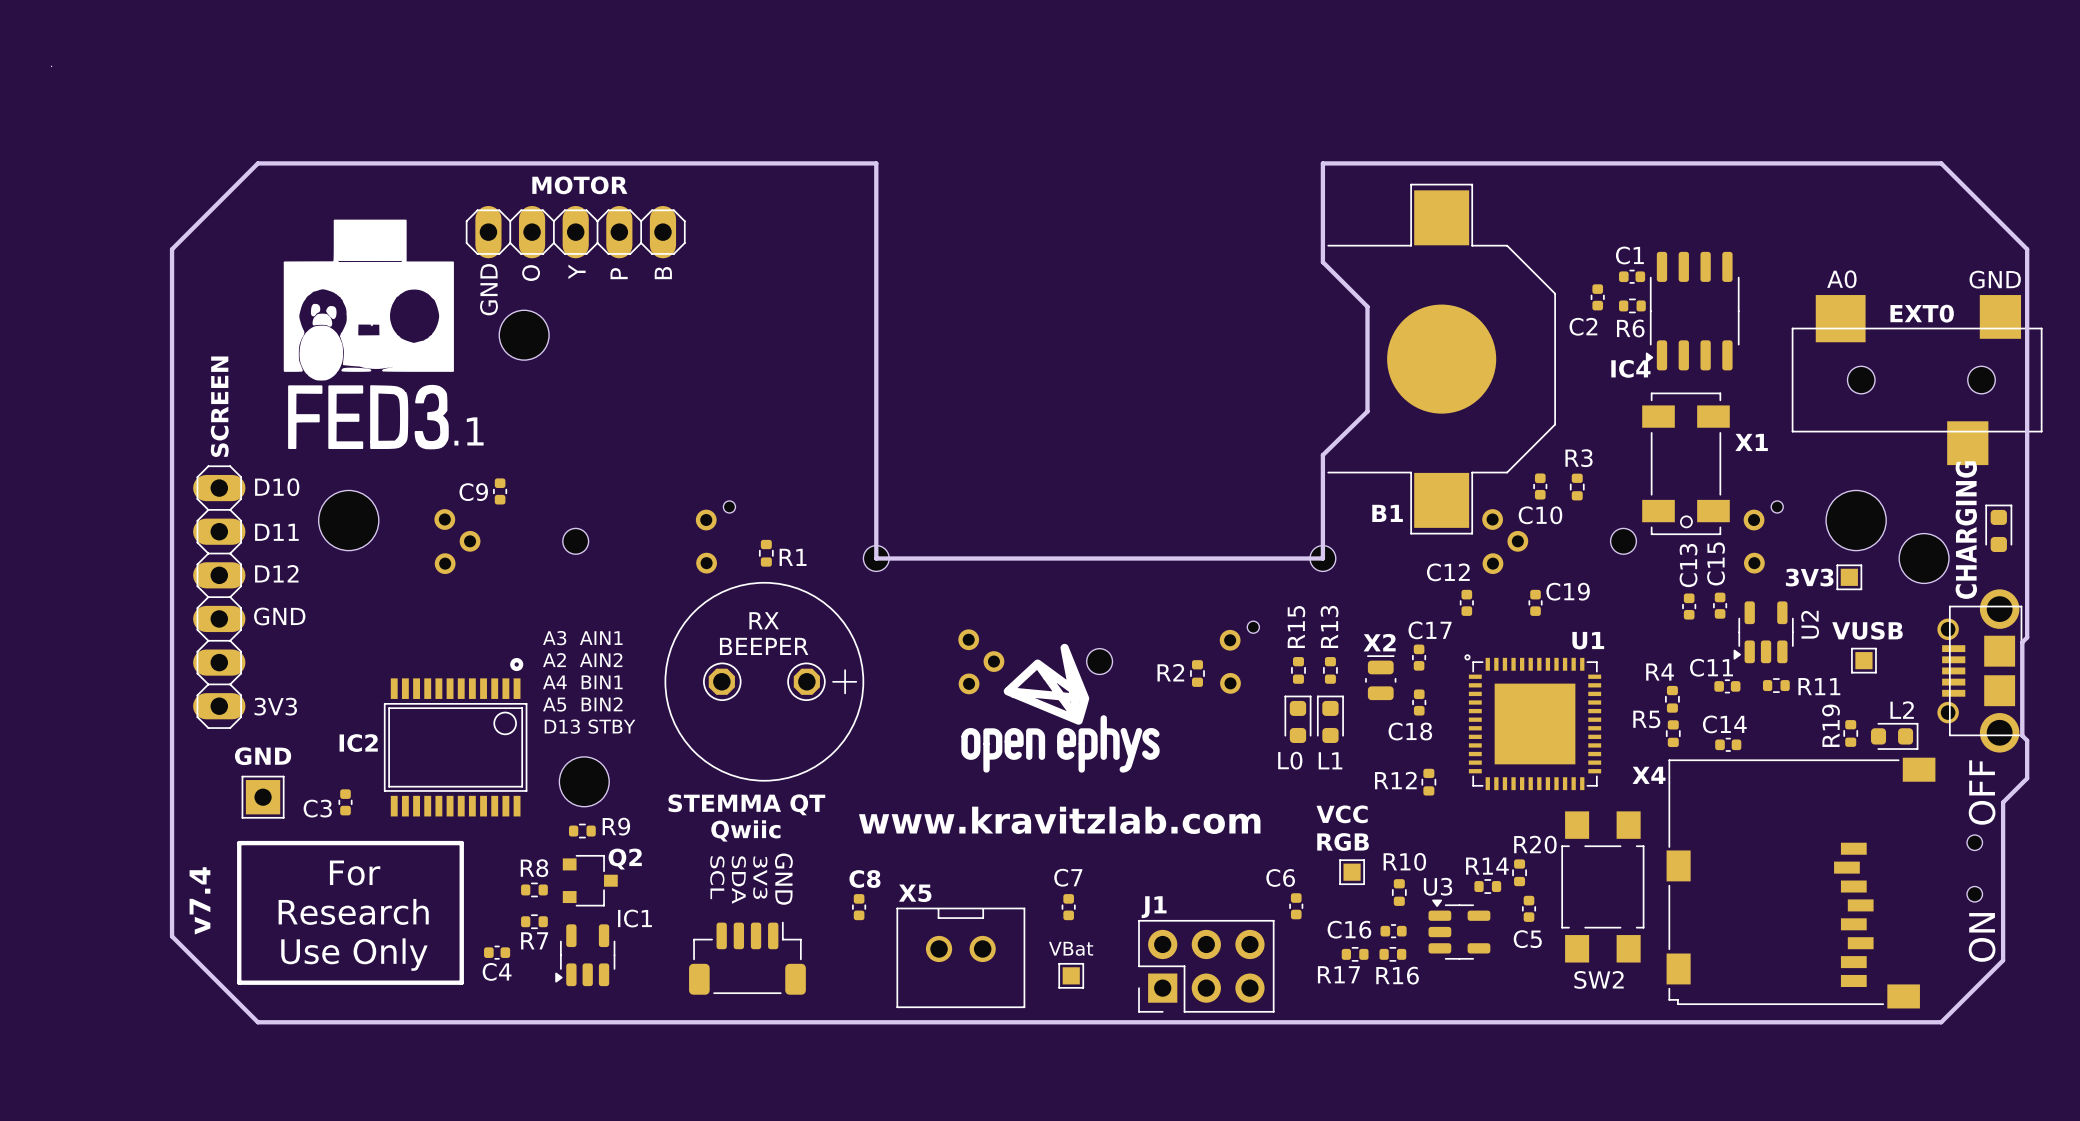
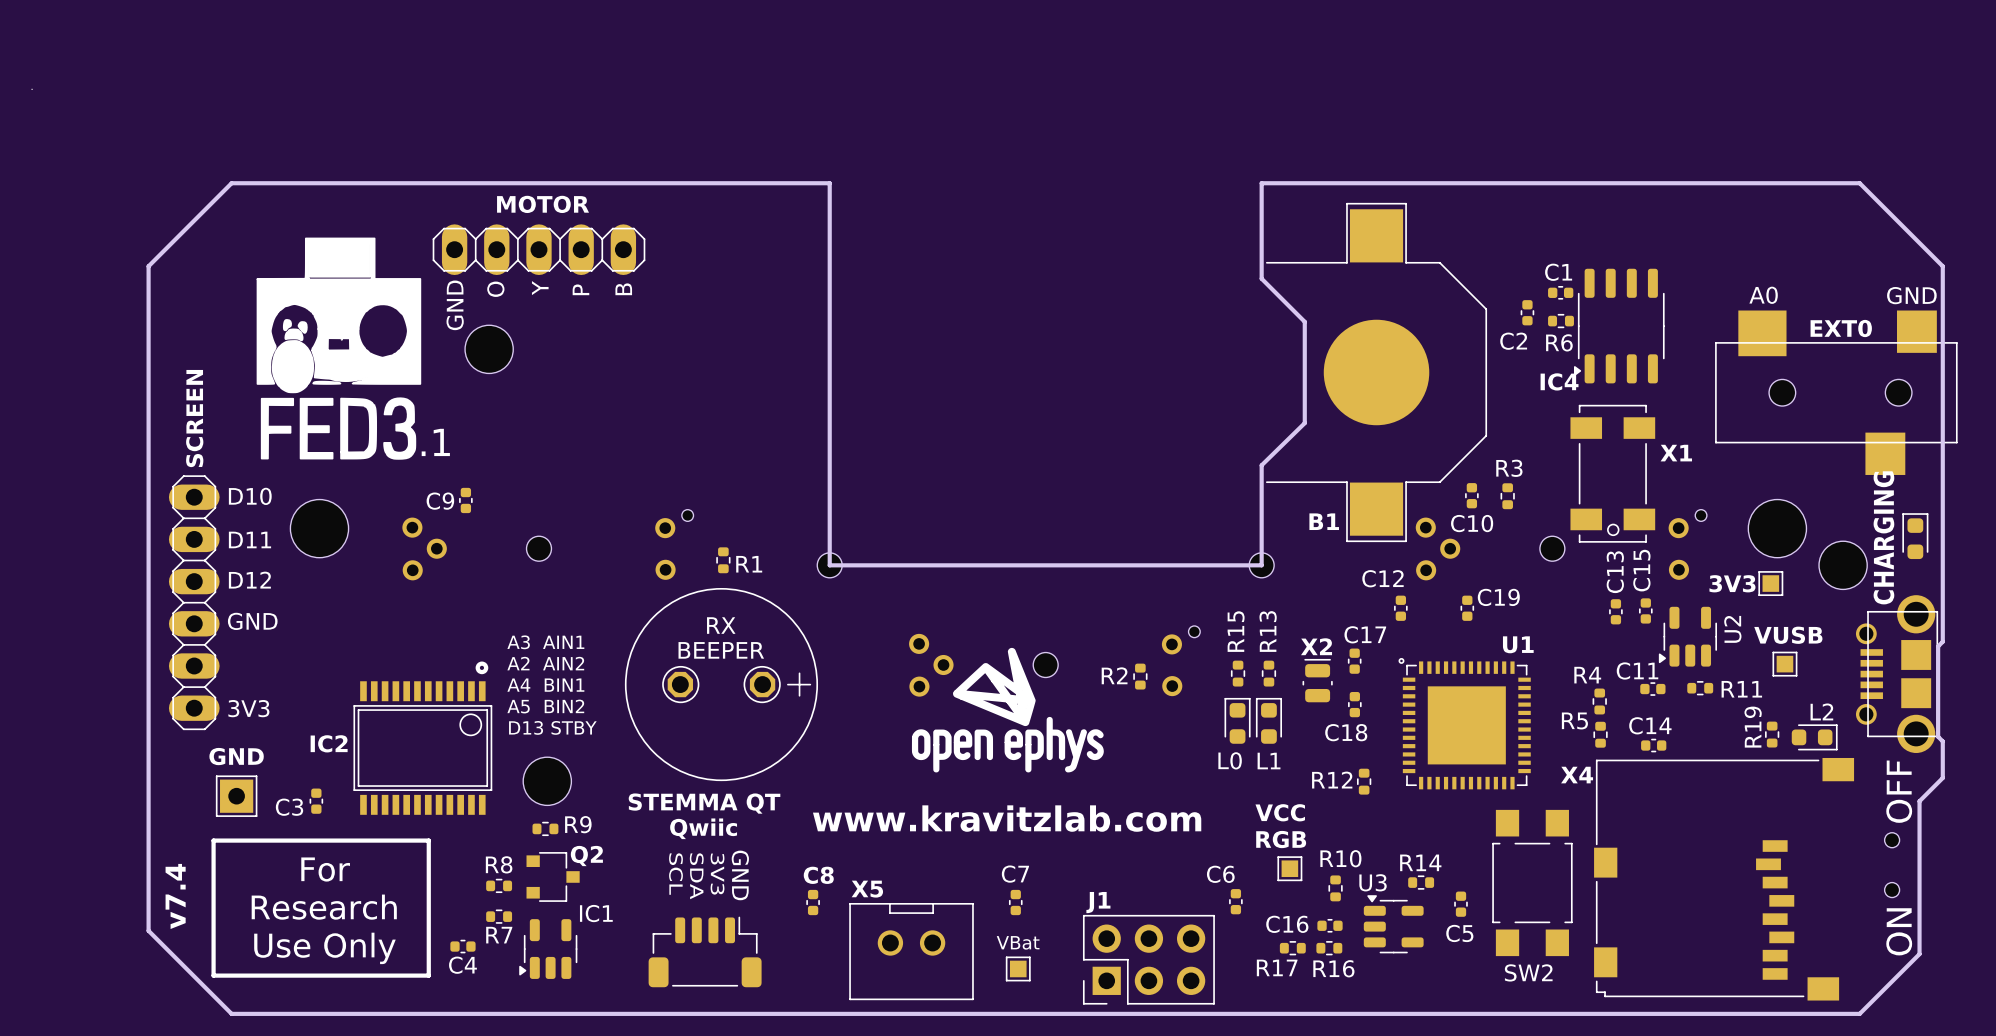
R20: (1519, 872) -> none

